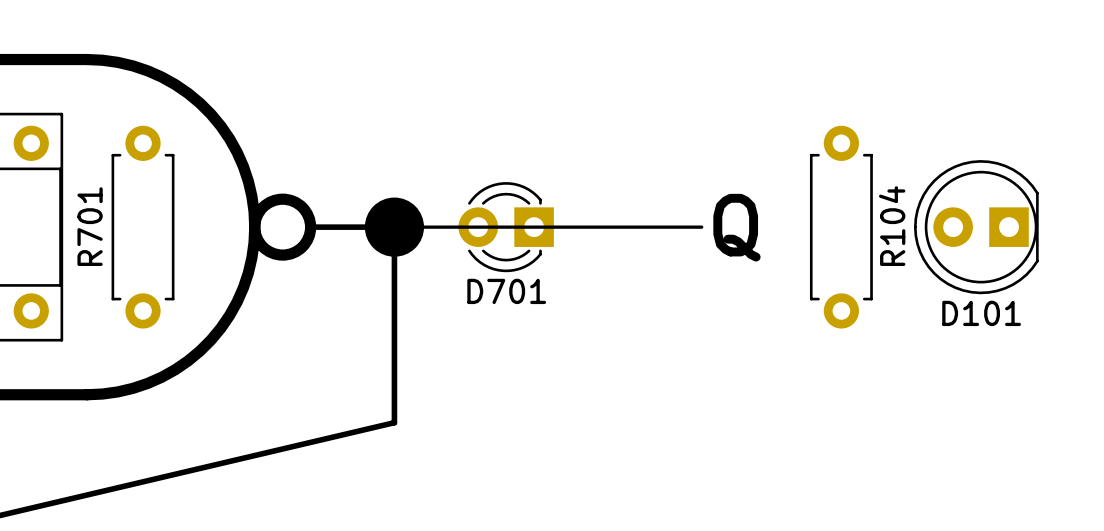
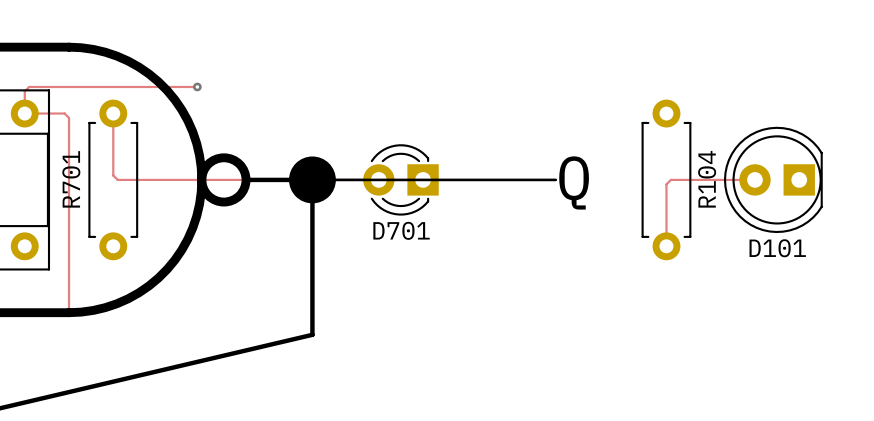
track: none -> (197, 86) (29, 86) (24, 91) (24, 113) (64, 113) (69, 117) (69, 312)
via: none -> (197, 86)
track: none -> (113, 113) (113, 175) (117, 179) (378, 179)
track: none -> (754, 179) (670, 179) (666, 184) (666, 246)

